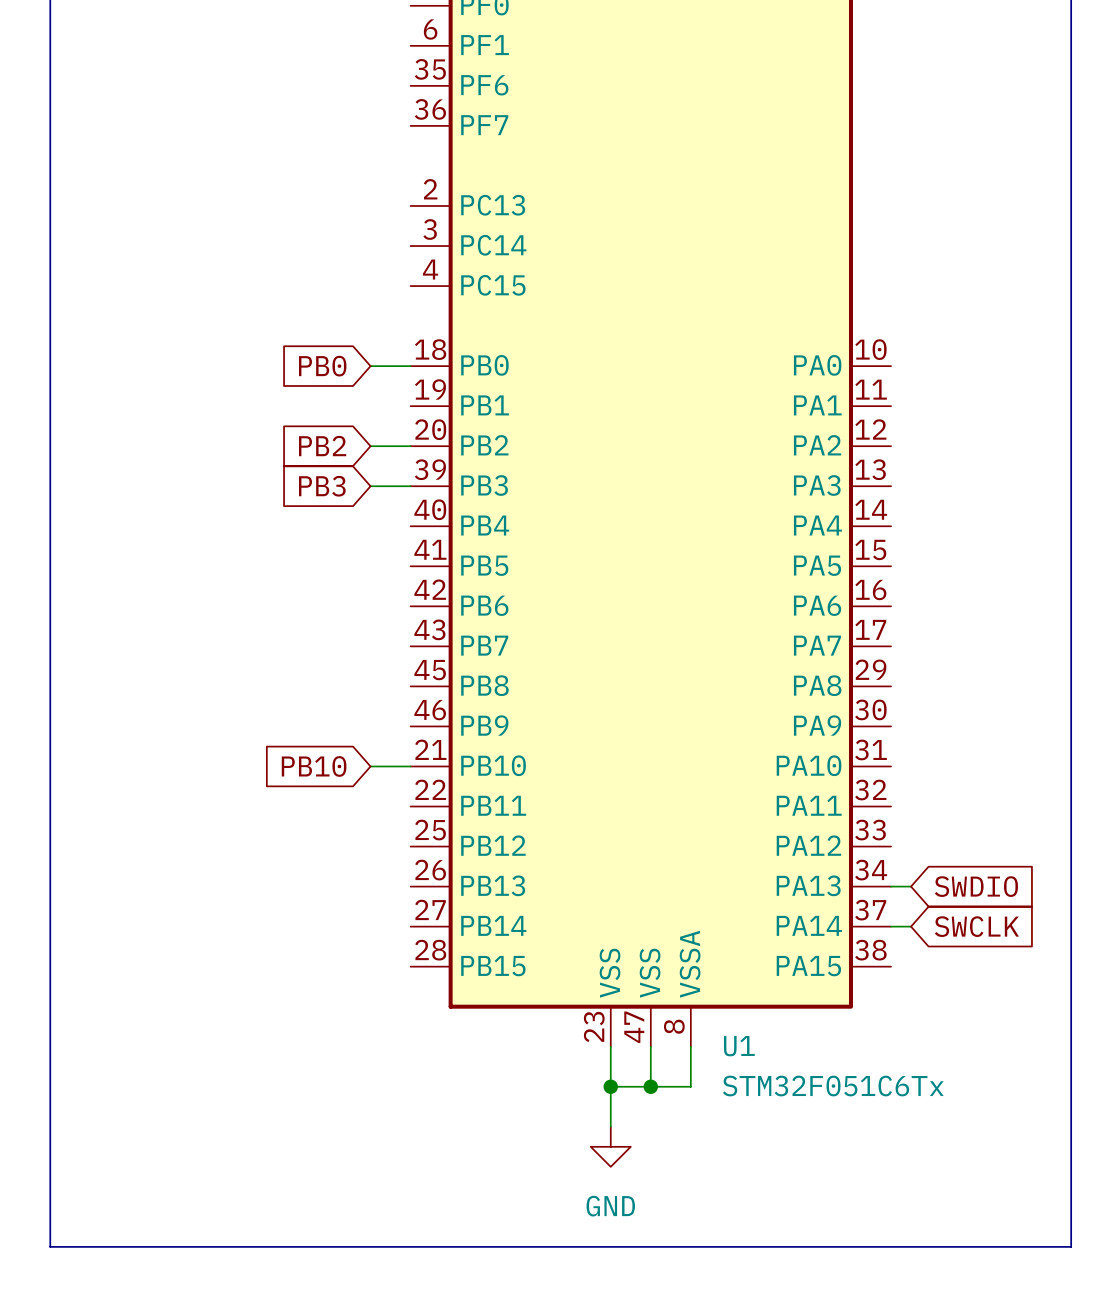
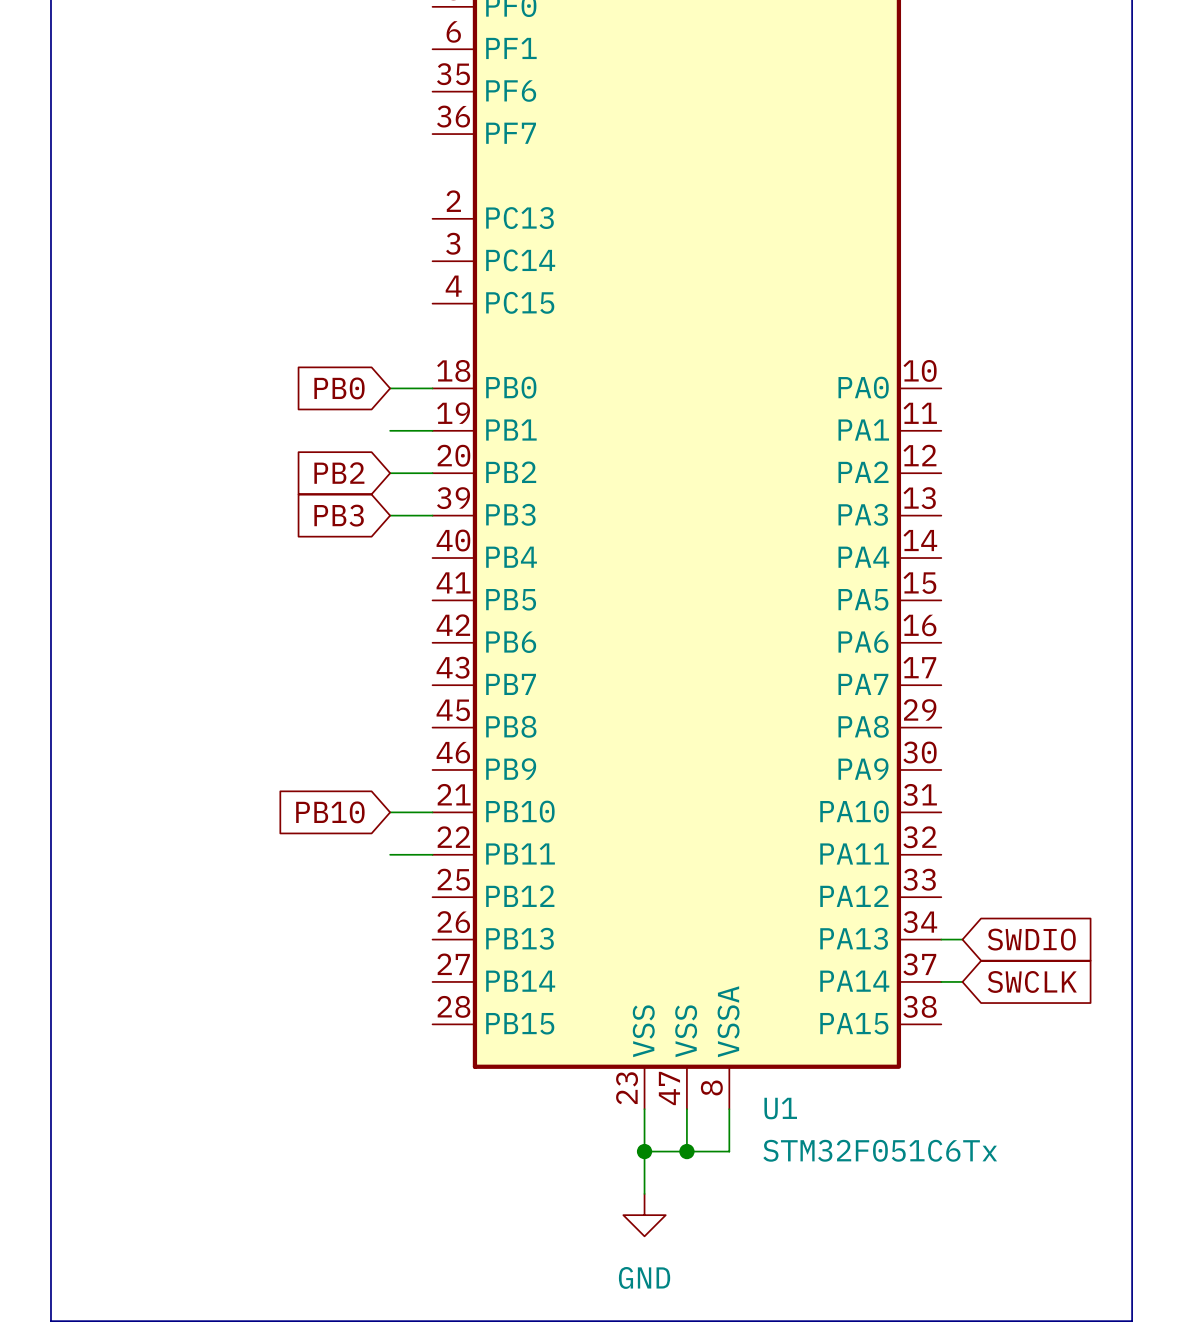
wire: none -> (390, 430) (432, 430)
wire: none -> (390, 854) (432, 854)

